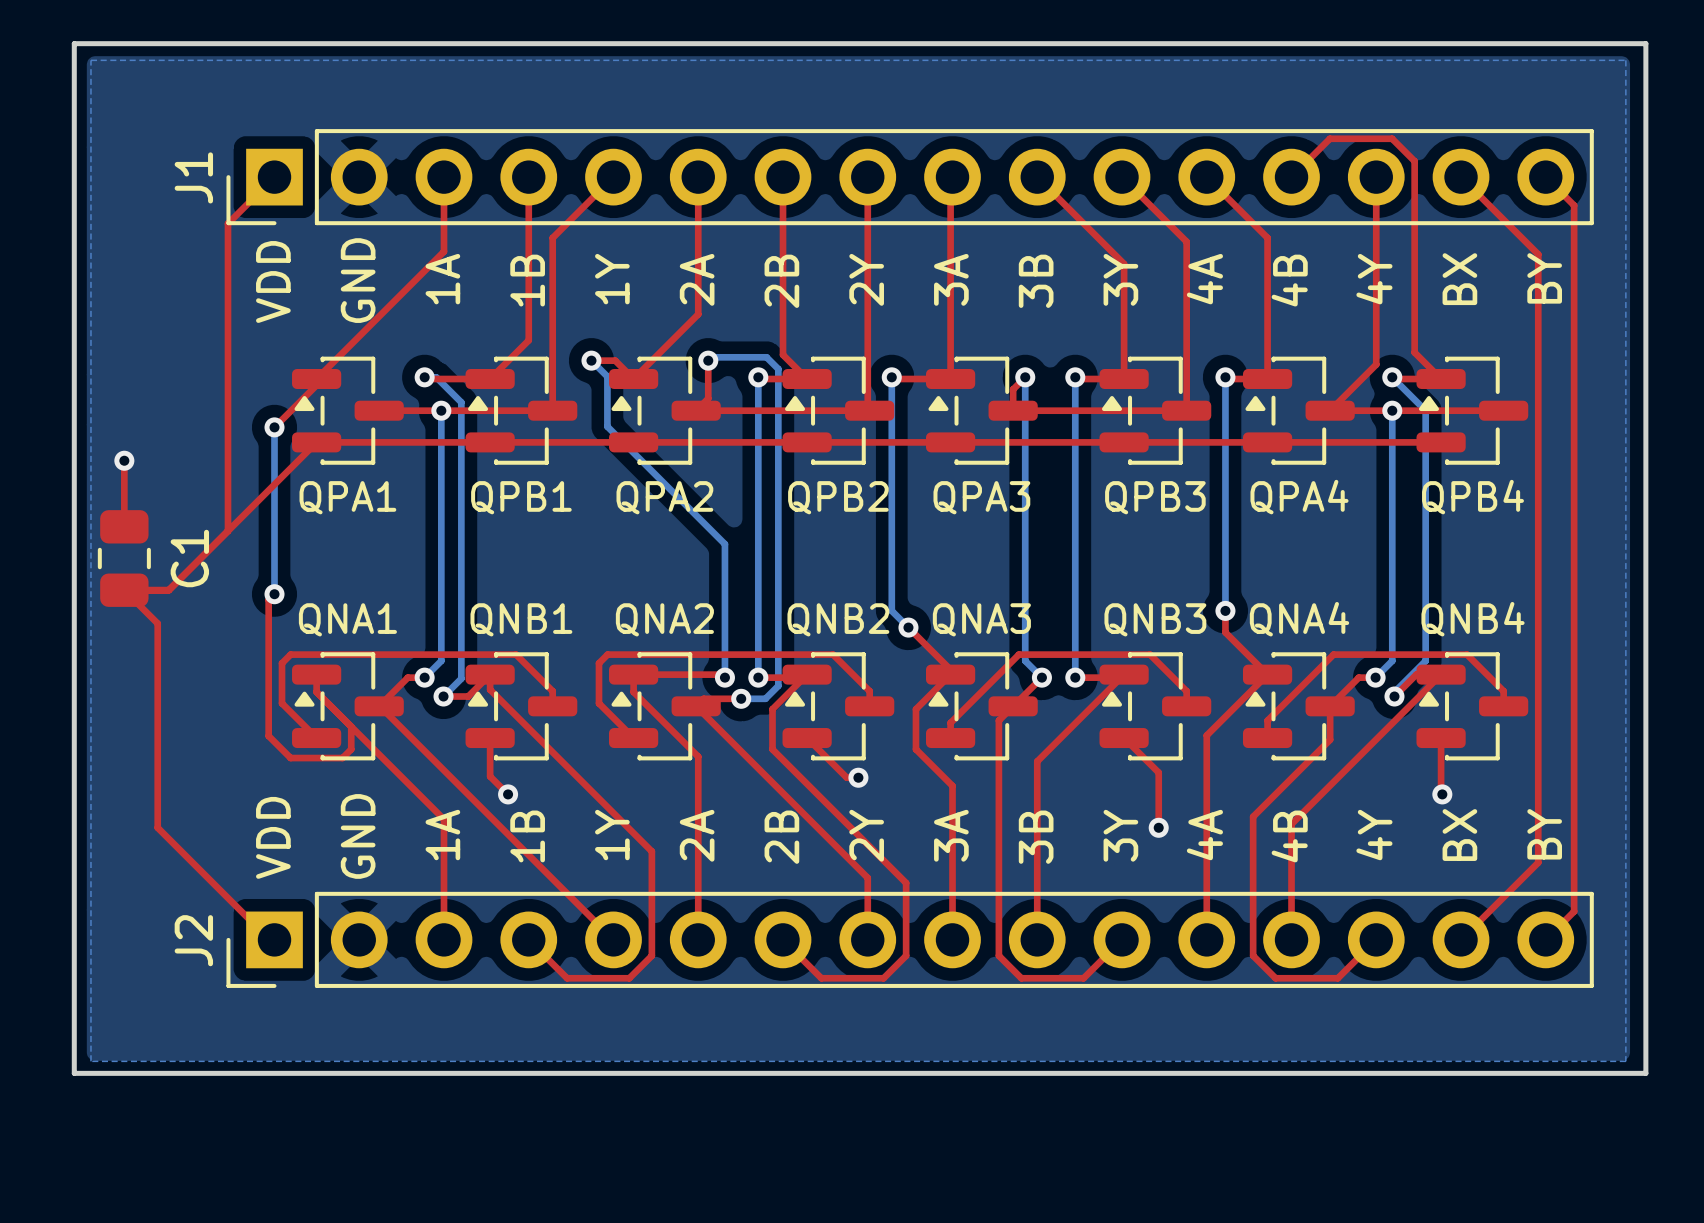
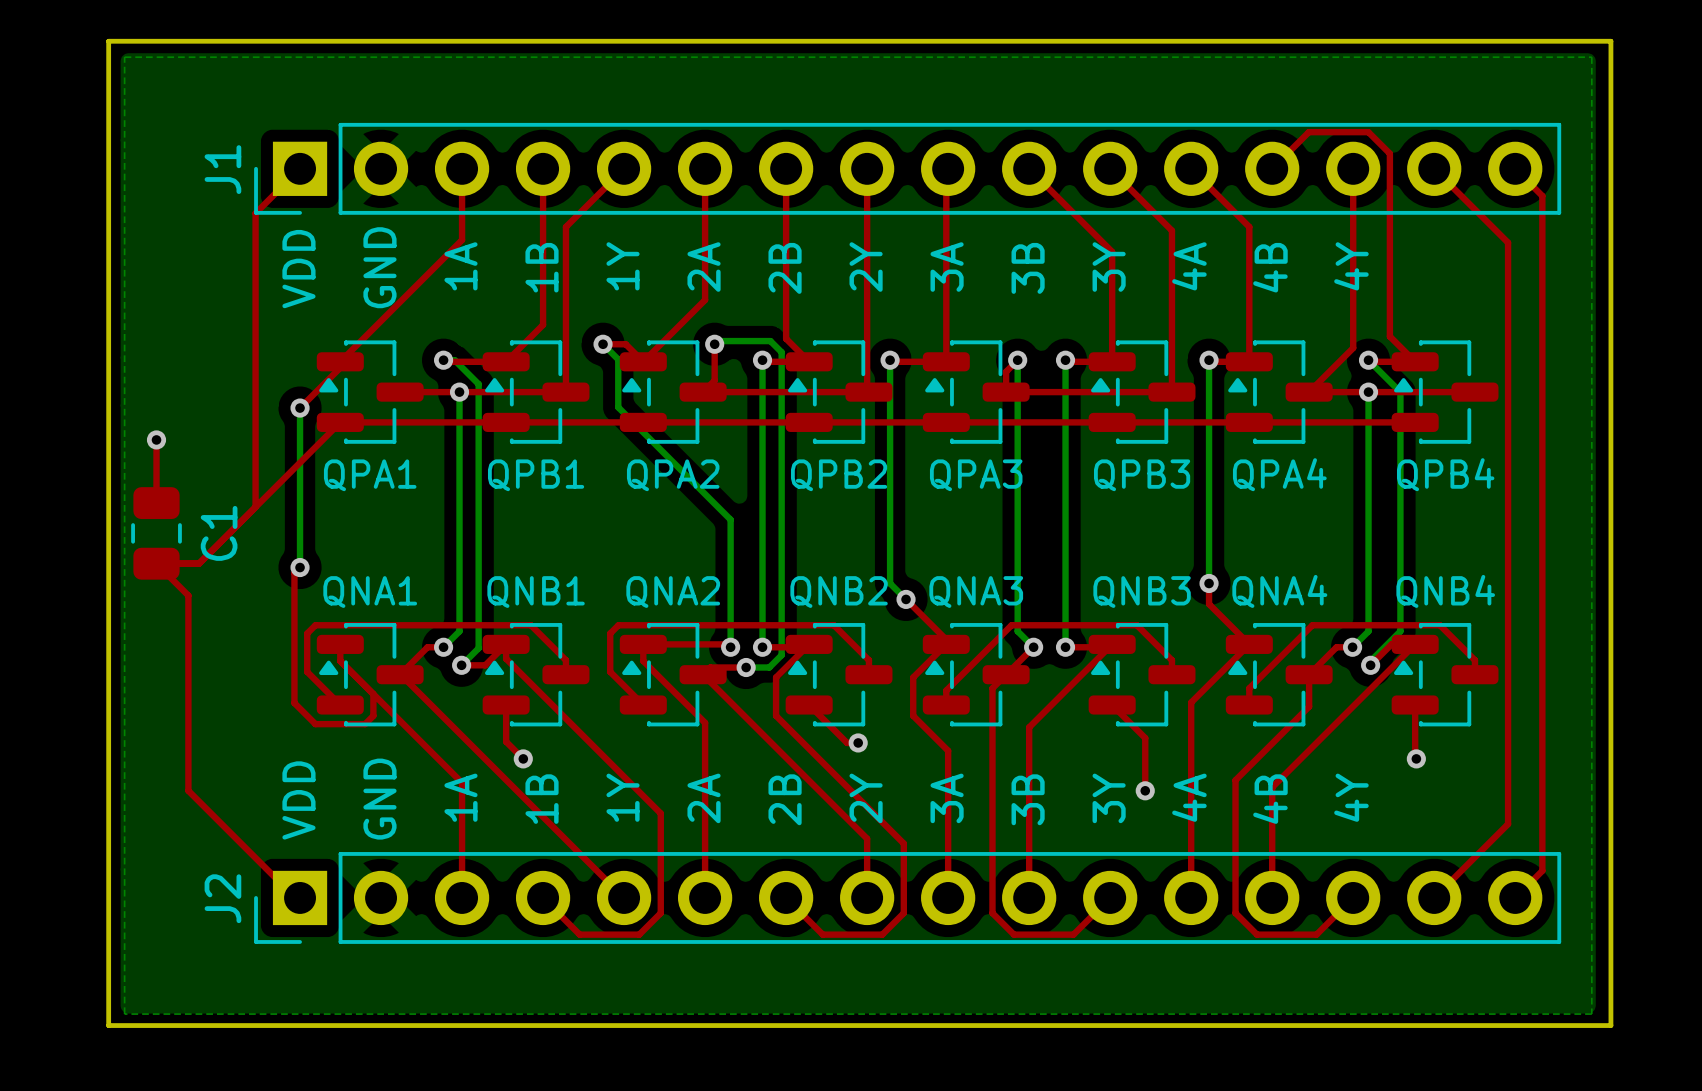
text: BY (1544, 278) -> none
text: BX (1459, 279) -> none
text: BY (1544, 834) -> none
text: BX (1459, 835) -> none

